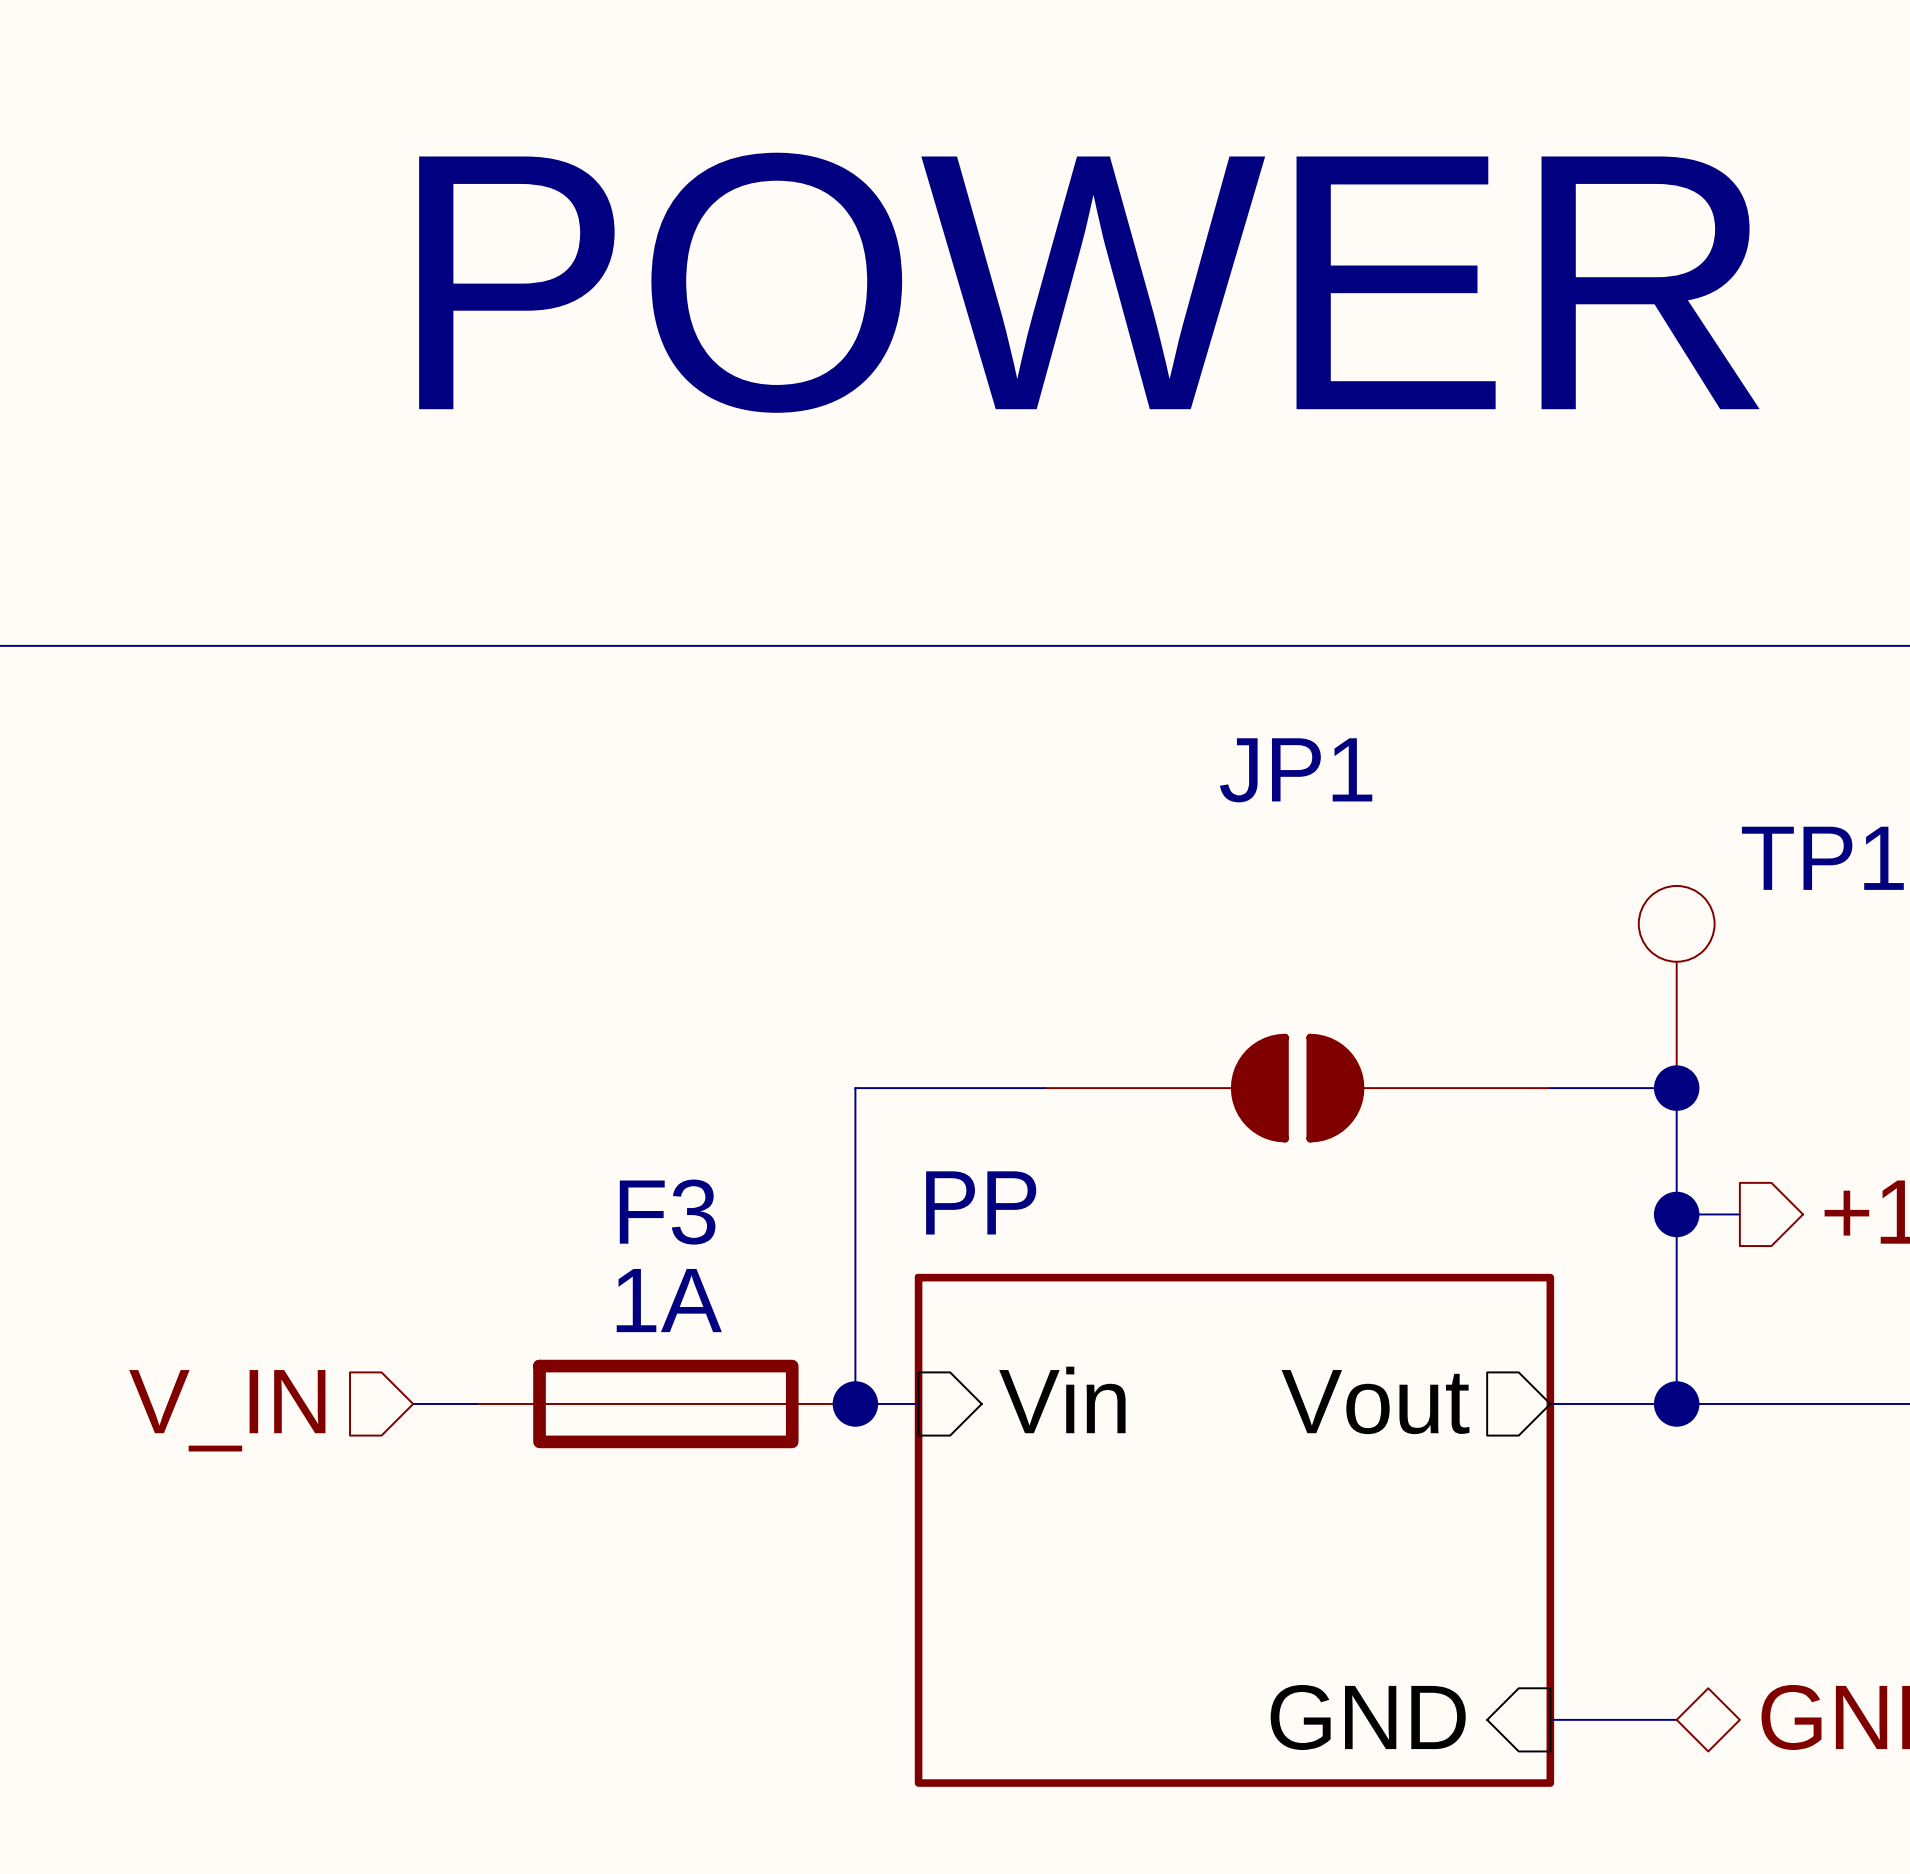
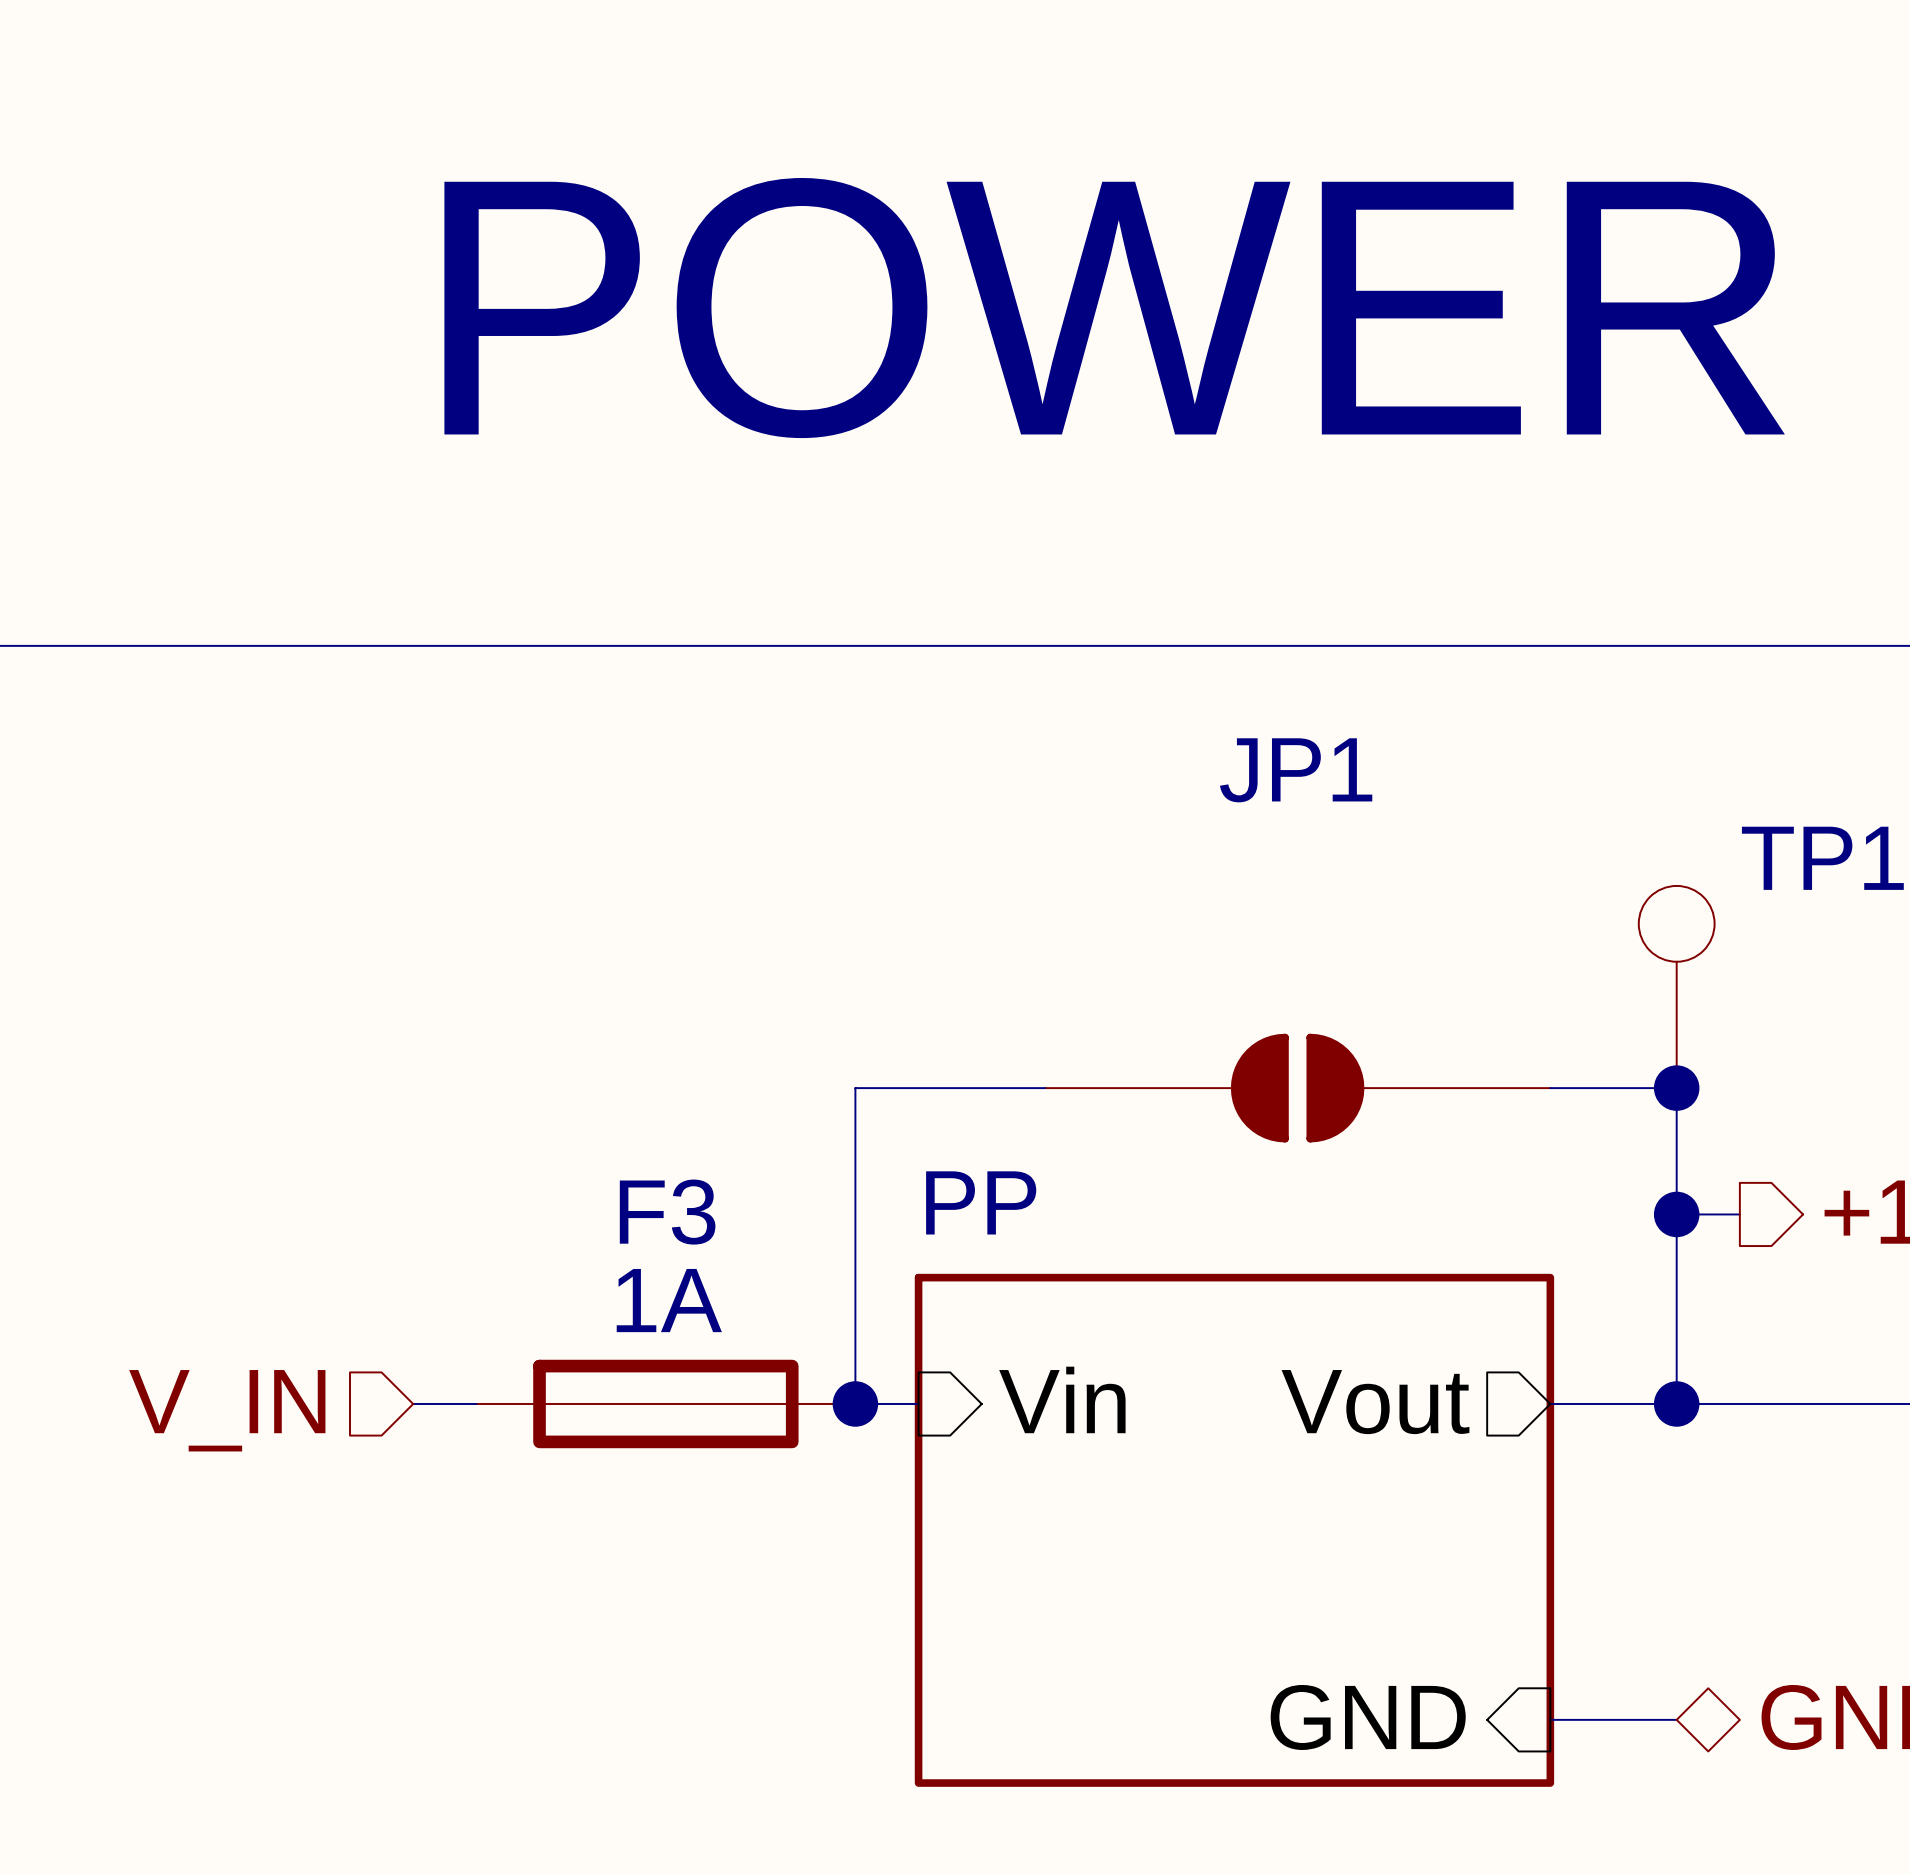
text position: POWER (1089, 282) -> POWER (1114, 308)

